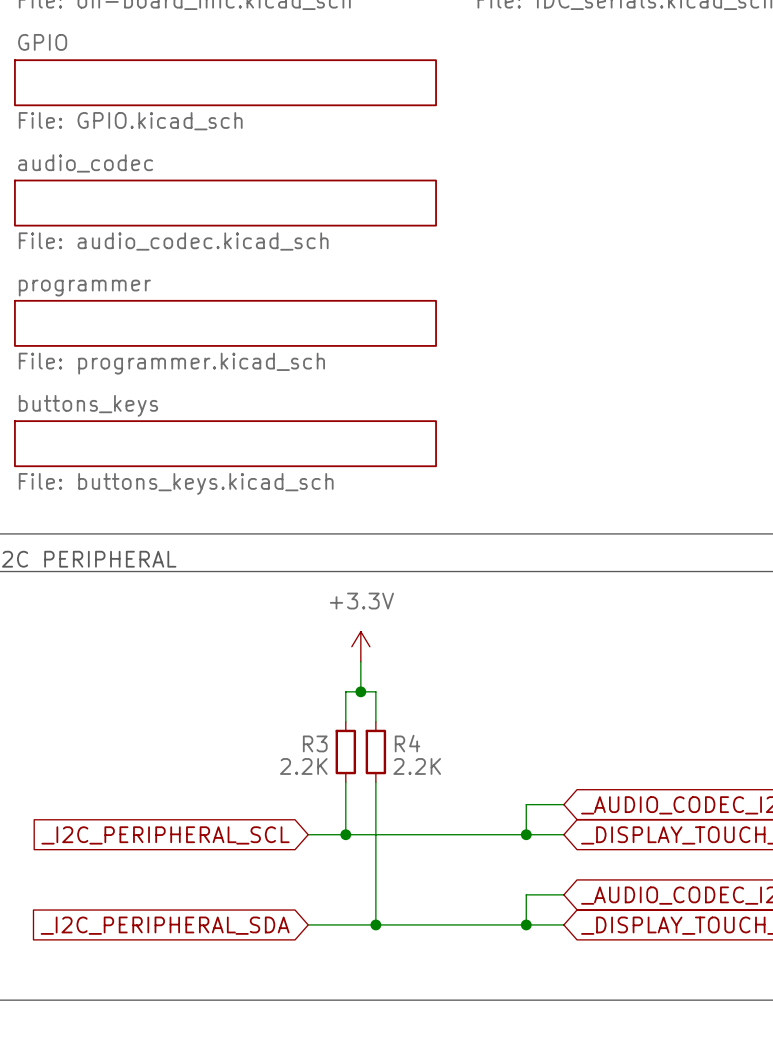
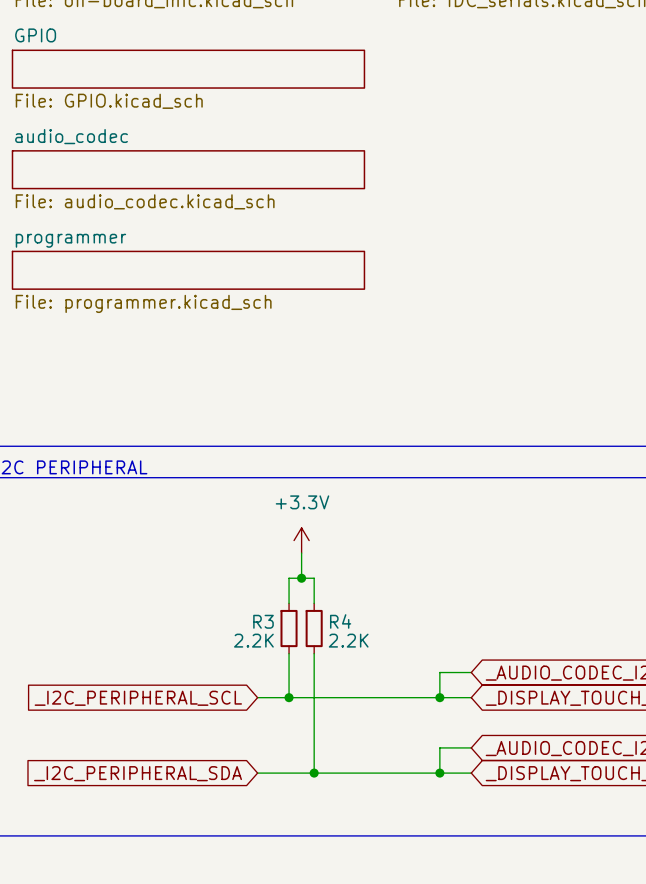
sheet buttons_keys: File: buttons_keys.kicad_sch (225, 443) -> none

